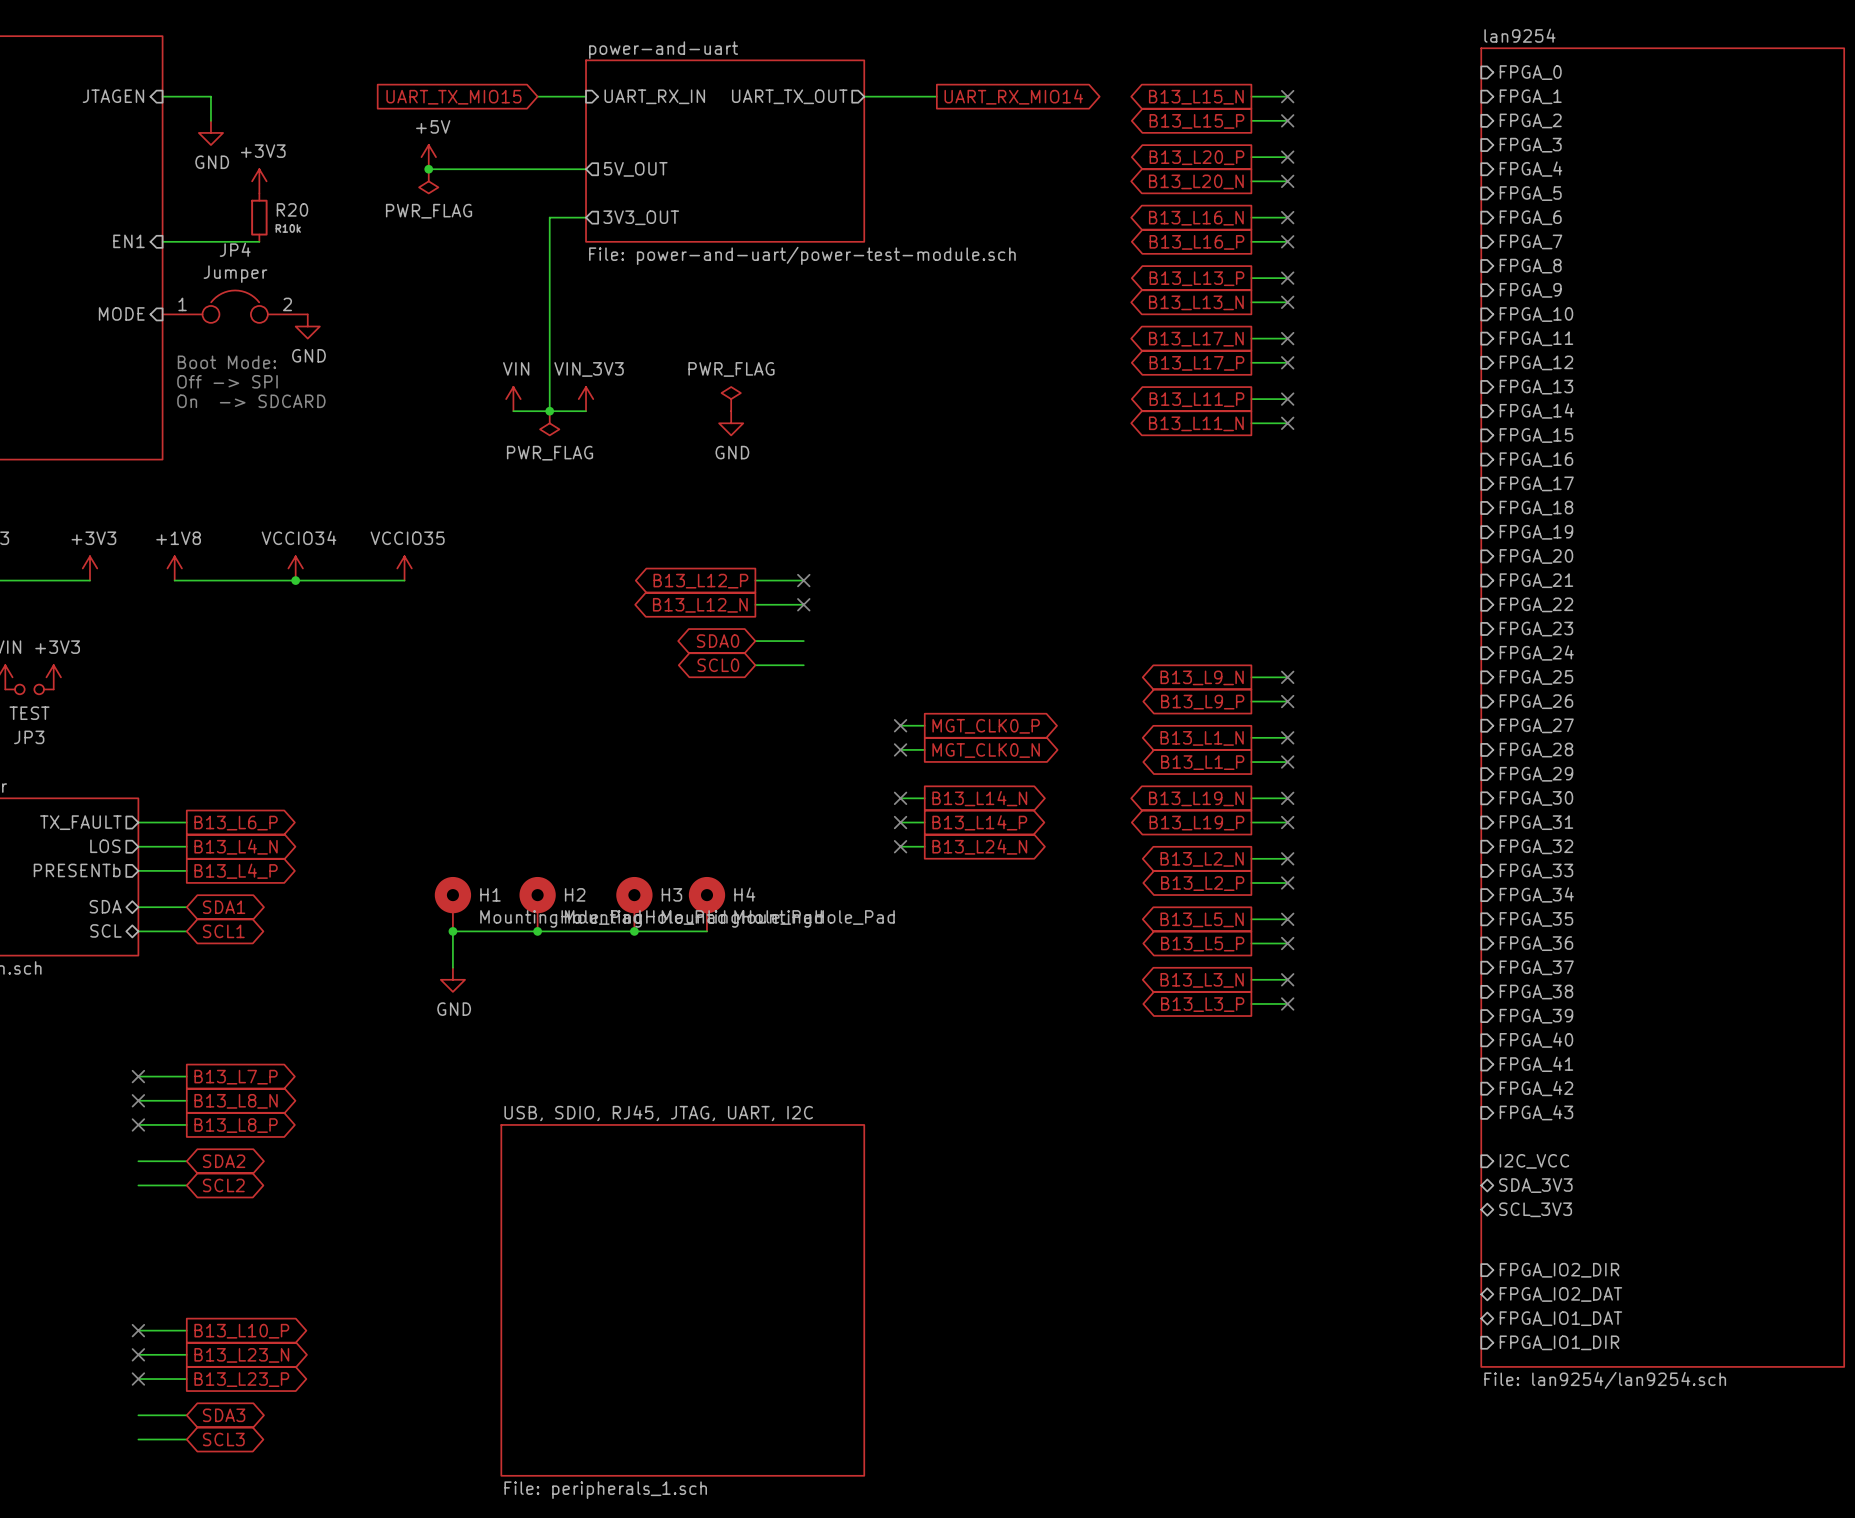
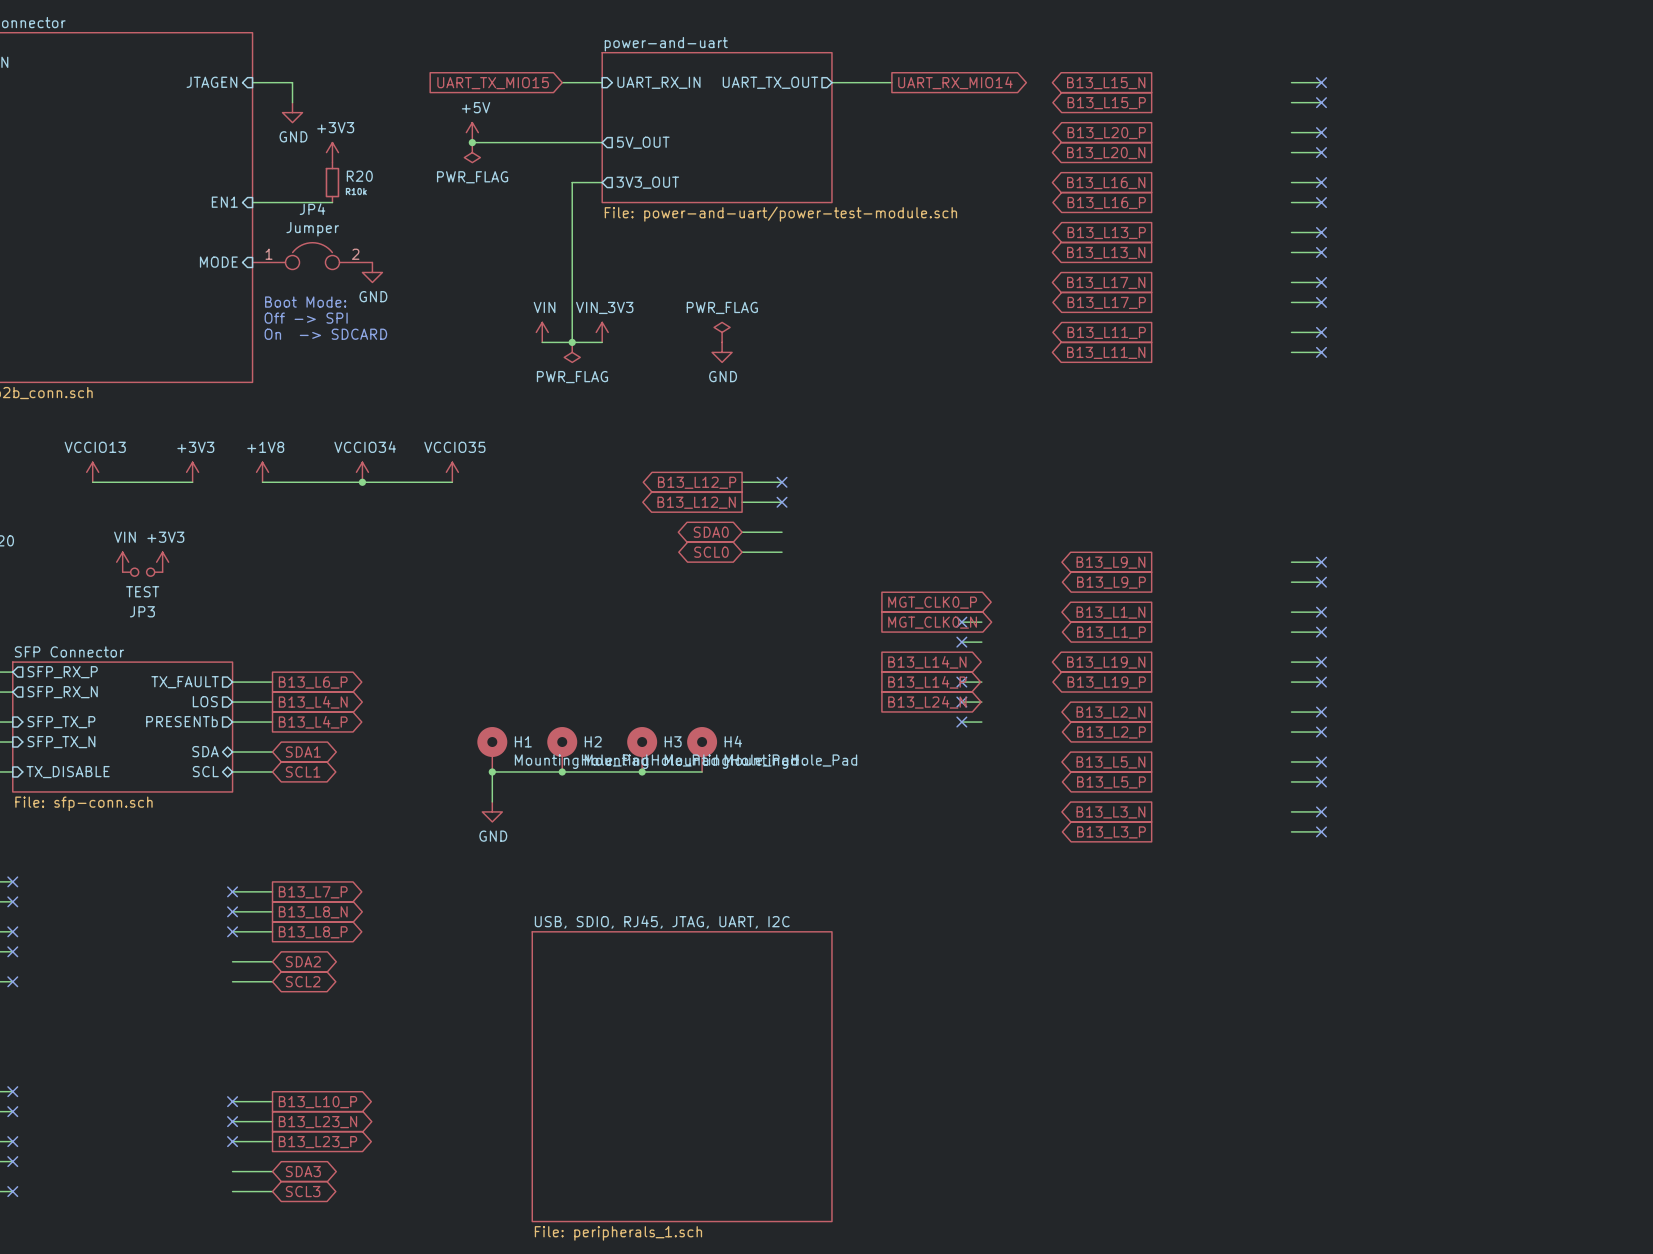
sheet pin: FPGA_0 (1530, 72) -> none
wire: (1251, 96) (1287, 96) -> (1291, 82) (1321, 82)
no-connect mark: (1287, 96) -> none
no-connect mark: none -> (1321, 82)
sheet pin: FPGA_1 (1530, 96) -> none
wire: (1251, 120) (1287, 120) -> (1291, 102) (1321, 102)
no-connect mark: (1287, 120) -> none
no-connect mark: none -> (1321, 102)
sheet pin: FPGA_2 (1530, 120) -> none
sheet pin: FPGA_3 (1530, 145) -> none
wire: (1251, 157) (1287, 157) -> (1291, 132) (1321, 132)
no-connect mark: (1287, 157) -> none
no-connect mark: none -> (1321, 132)
sheet pin: FPGA_4 (1530, 169) -> none
wire: (1251, 181) (1287, 181) -> (1291, 152) (1321, 152)
no-connect mark: (1287, 181) -> none
no-connect mark: none -> (1321, 152)
sheet pin: FPGA_5 (1530, 193) -> none
wire: (1251, 217) (1287, 217) -> (1291, 182) (1321, 182)
no-connect mark: (1287, 217) -> none
no-connect mark: none -> (1321, 182)
sheet pin: FPGA_6 (1530, 217) -> none
wire: (1251, 241) (1287, 241) -> (1291, 202) (1321, 202)
no-connect mark: (1287, 241) -> none
no-connect mark: none -> (1321, 202)
sheet pin: FPGA_7 (1530, 241) -> none
sheet pin: FPGA_8 (1530, 266) -> none
wire: (1251, 278) (1287, 278) -> (1291, 232) (1321, 232)
no-connect mark: (1287, 278) -> none
no-connect mark: none -> (1321, 232)
sheet pin: FPGA_9 (1530, 290) -> none
wire: (1251, 302) (1287, 302) -> (1291, 252) (1321, 252)
no-connect mark: (1287, 302) -> none
no-connect mark: none -> (1321, 252)
sheet pin: FPGA_10 (1536, 314) -> none
wire: (1251, 338) (1287, 338) -> (1291, 282) (1321, 282)
no-connect mark: (1287, 338) -> none
no-connect mark: none -> (1321, 282)
sheet pin: FPGA_11 (1536, 338) -> none
wire: (1251, 362) (1287, 362) -> (1291, 302) (1321, 302)
no-connect mark: (1287, 362) -> none
no-connect mark: none -> (1321, 302)
sheet pin: FPGA_12 (1536, 362) -> none
sheet pin: FPGA_13 (1536, 387) -> none
wire: (1251, 399) (1287, 399) -> (1291, 332) (1321, 332)
no-connect mark: (1287, 399) -> none
no-connect mark: none -> (1321, 332)
sheet pin: FPGA_14 (1536, 411) -> none
wire: (1251, 423) (1287, 423) -> (1291, 352) (1321, 352)
no-connect mark: (1287, 423) -> none
no-connect mark: none -> (1321, 352)
sheet pin: FPGA_15 (1536, 435) -> none
sheet pin: FPGA_16 (1536, 459) -> none
sheet pin: FPGA_17 (1536, 483) -> none
sheet pin: FPGA_18 (1536, 508) -> none
sheet pin: FPGA_19 (1536, 532) -> none
sheet pin: FPGA_20 (1536, 556) -> none
sheet pin: FPGA_21 (1536, 580) -> none
sheet pin: FPGA_22 (1536, 604) -> none
sheet pin: FPGA_23 (1536, 629) -> none
sheet pin: FPGA_24 (1536, 652) -> none
wire: (1251, 677) (1287, 677) -> (1291, 562) (1321, 562)
no-connect mark: (1287, 677) -> none
no-connect mark: none -> (1321, 562)
sheet pin: FPGA_25 (1536, 677) -> none
wire: (1251, 701) (1287, 701) -> (1291, 582) (1321, 582)
no-connect mark: (1287, 701) -> none
no-connect mark: none -> (1321, 582)
sheet pin: FPGA_26 (1536, 701) -> none
sheet lan9254: File: lan9254/lan9254.sch (1662, 707) -> none
wire: (900, 725) (924, 725) -> (961, 622) (981, 622)
no-connect mark: (900, 725) -> none
sheet pin: FPGA_27 (1536, 725) -> none
wire: (1251, 737) (1287, 737) -> (1291, 612) (1321, 612)
no-connect mark: (1287, 737) -> none
no-connect mark: none -> (1321, 612)
wire: (900, 749) (924, 749) -> (961, 642) (981, 642)
no-connect mark: (900, 749) -> none
no-connect mark: none -> (961, 622)
sheet pin: FPGA_28 (1536, 750) -> none
wire: (1251, 762) (1287, 762) -> (1291, 632) (1321, 632)
no-connect mark: (1287, 762) -> none
no-connect mark: none -> (1321, 632)
no-connect mark: none -> (961, 642)
sheet pin: FPGA_29 (1536, 774) -> none
wire: (900, 798) (924, 798) -> (961, 682) (981, 682)
no-connect mark: (900, 798) -> none
wire: (1251, 798) (1287, 798) -> (1291, 662) (1321, 662)
no-connect mark: (1287, 798) -> none
no-connect mark: none -> (1321, 662)
sheet pin: FPGA_30 (1536, 798) -> none
wire: (900, 822) (924, 822) -> (961, 702) (981, 702)
no-connect mark: (900, 822) -> none
no-connect mark: none -> (961, 682)
wire: (1251, 822) (1287, 822) -> (1291, 682) (1321, 682)
no-connect mark: (1287, 822) -> none
no-connect mark: none -> (1321, 682)
sheet pin: FPGA_31 (1536, 822) -> none
wire: (900, 846) (924, 846) -> (961, 722) (981, 722)
no-connect mark: (900, 846) -> none
no-connect mark: none -> (961, 702)
sheet pin: FPGA_32 (1536, 846) -> none
wire: (1251, 858) (1287, 858) -> (1291, 712) (1321, 712)
no-connect mark: (1287, 858) -> none
no-connect mark: none -> (1321, 712)
no-connect mark: none -> (961, 722)
sheet pin: FPGA_33 (1536, 871) -> none
wire: (1251, 883) (1287, 883) -> (1291, 732) (1321, 732)
no-connect mark: (1287, 883) -> none
no-connect mark: none -> (1321, 732)
sheet pin: FPGA_34 (1536, 894) -> none
wire: (1251, 919) (1287, 919) -> (1291, 761) (1321, 761)
no-connect mark: (1287, 919) -> none
no-connect mark: none -> (1321, 761)
sheet pin: FPGA_35 (1536, 919) -> none
wire: (1251, 943) (1287, 943) -> (1291, 781) (1321, 781)
no-connect mark: (1287, 943) -> none
no-connect mark: none -> (1321, 781)
sheet pin: FPGA_36 (1536, 943) -> none
sheet pin: FPGA_37 (1536, 967) -> none
wire: (1251, 979) (1287, 979) -> (1291, 811) (1321, 811)
no-connect mark: (1287, 979) -> none
no-connect mark: none -> (1321, 811)
sheet pin: FPGA_38 (1536, 992) -> none
wire: (1251, 1003) (1287, 1003) -> (1291, 831) (1321, 831)
no-connect mark: (1287, 1003) -> none
no-connect mark: none -> (1321, 831)
sheet pin: FPGA_39 (1536, 1016) -> none
sheet pin: FPGA_40 (1536, 1040) -> none
sheet pin: FPGA_41 (1536, 1064) -> none
sheet pin: FPGA_42 (1536, 1088) -> none
sheet pin: FPGA_43 (1536, 1112) -> none
sheet pin: I2C_VCC (1534, 1161) -> none
sheet pin: SDA_3V3 (1535, 1185) -> none
sheet pin: SCL_3V3 (1535, 1209) -> none
sheet pin: FPGA_IO2_DIR (1559, 1270) -> none
sheet pin: FPGA_IO2_DAT (1560, 1294) -> none
sheet pin: FPGA_IO1_DAT (1560, 1318) -> none
sheet pin: FPGA_IO1_DIR (1559, 1342) -> none

